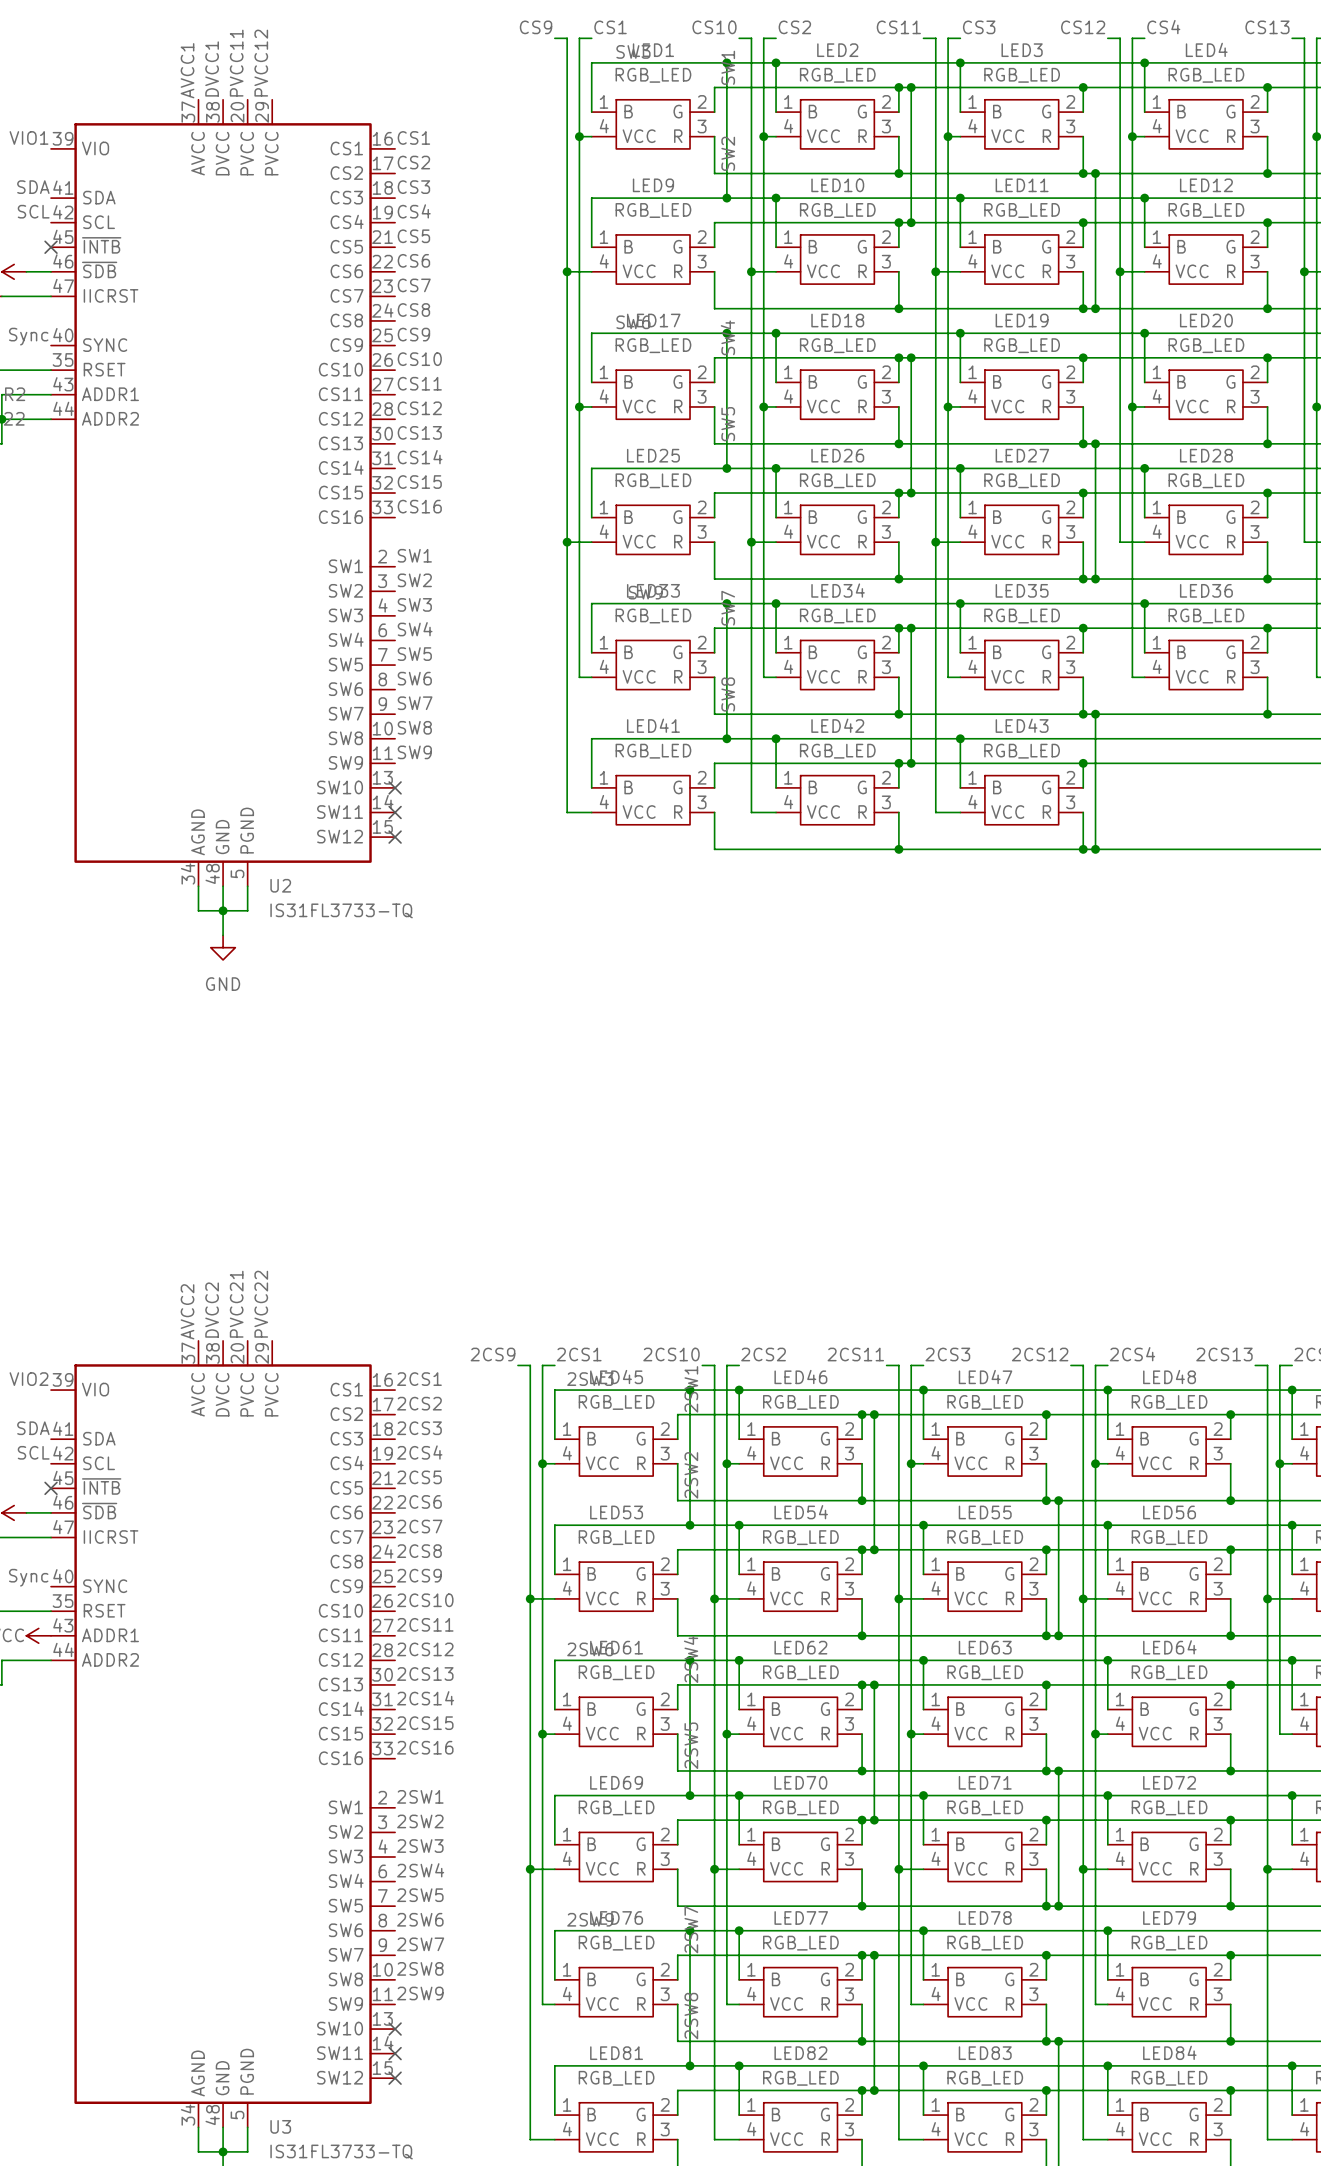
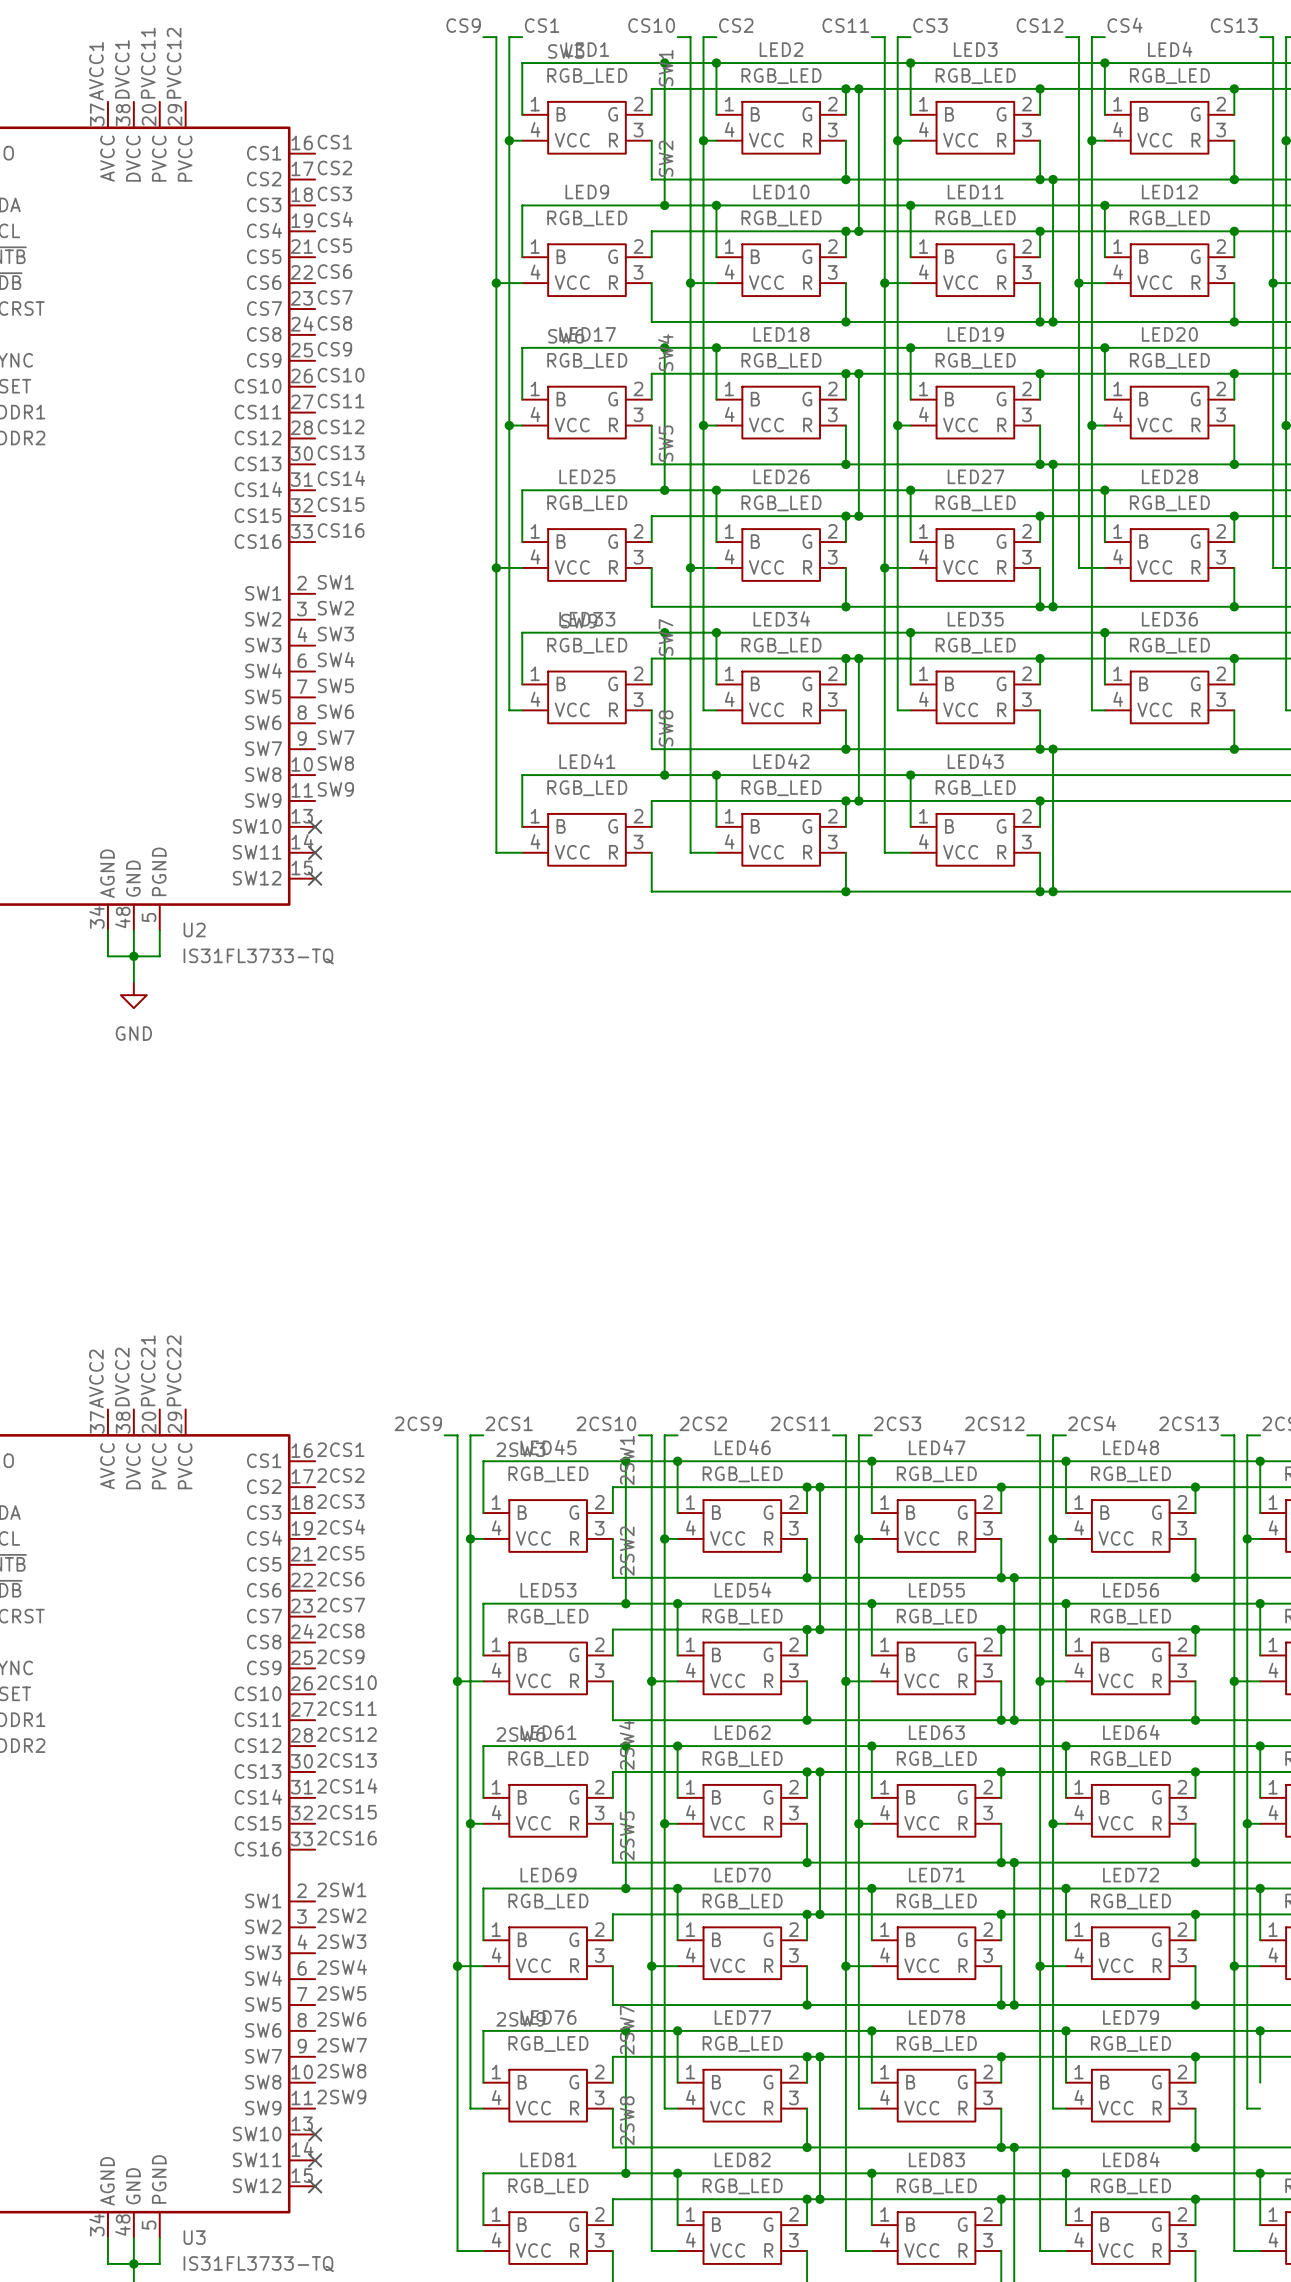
wire: none -> (1247, 1823) (1247, 2108) (1260, 2108)
junction: none -> (1247, 1823)
wire: none -> (1260, 2030) (1260, 2082)
junction: none -> (1260, 2030)

